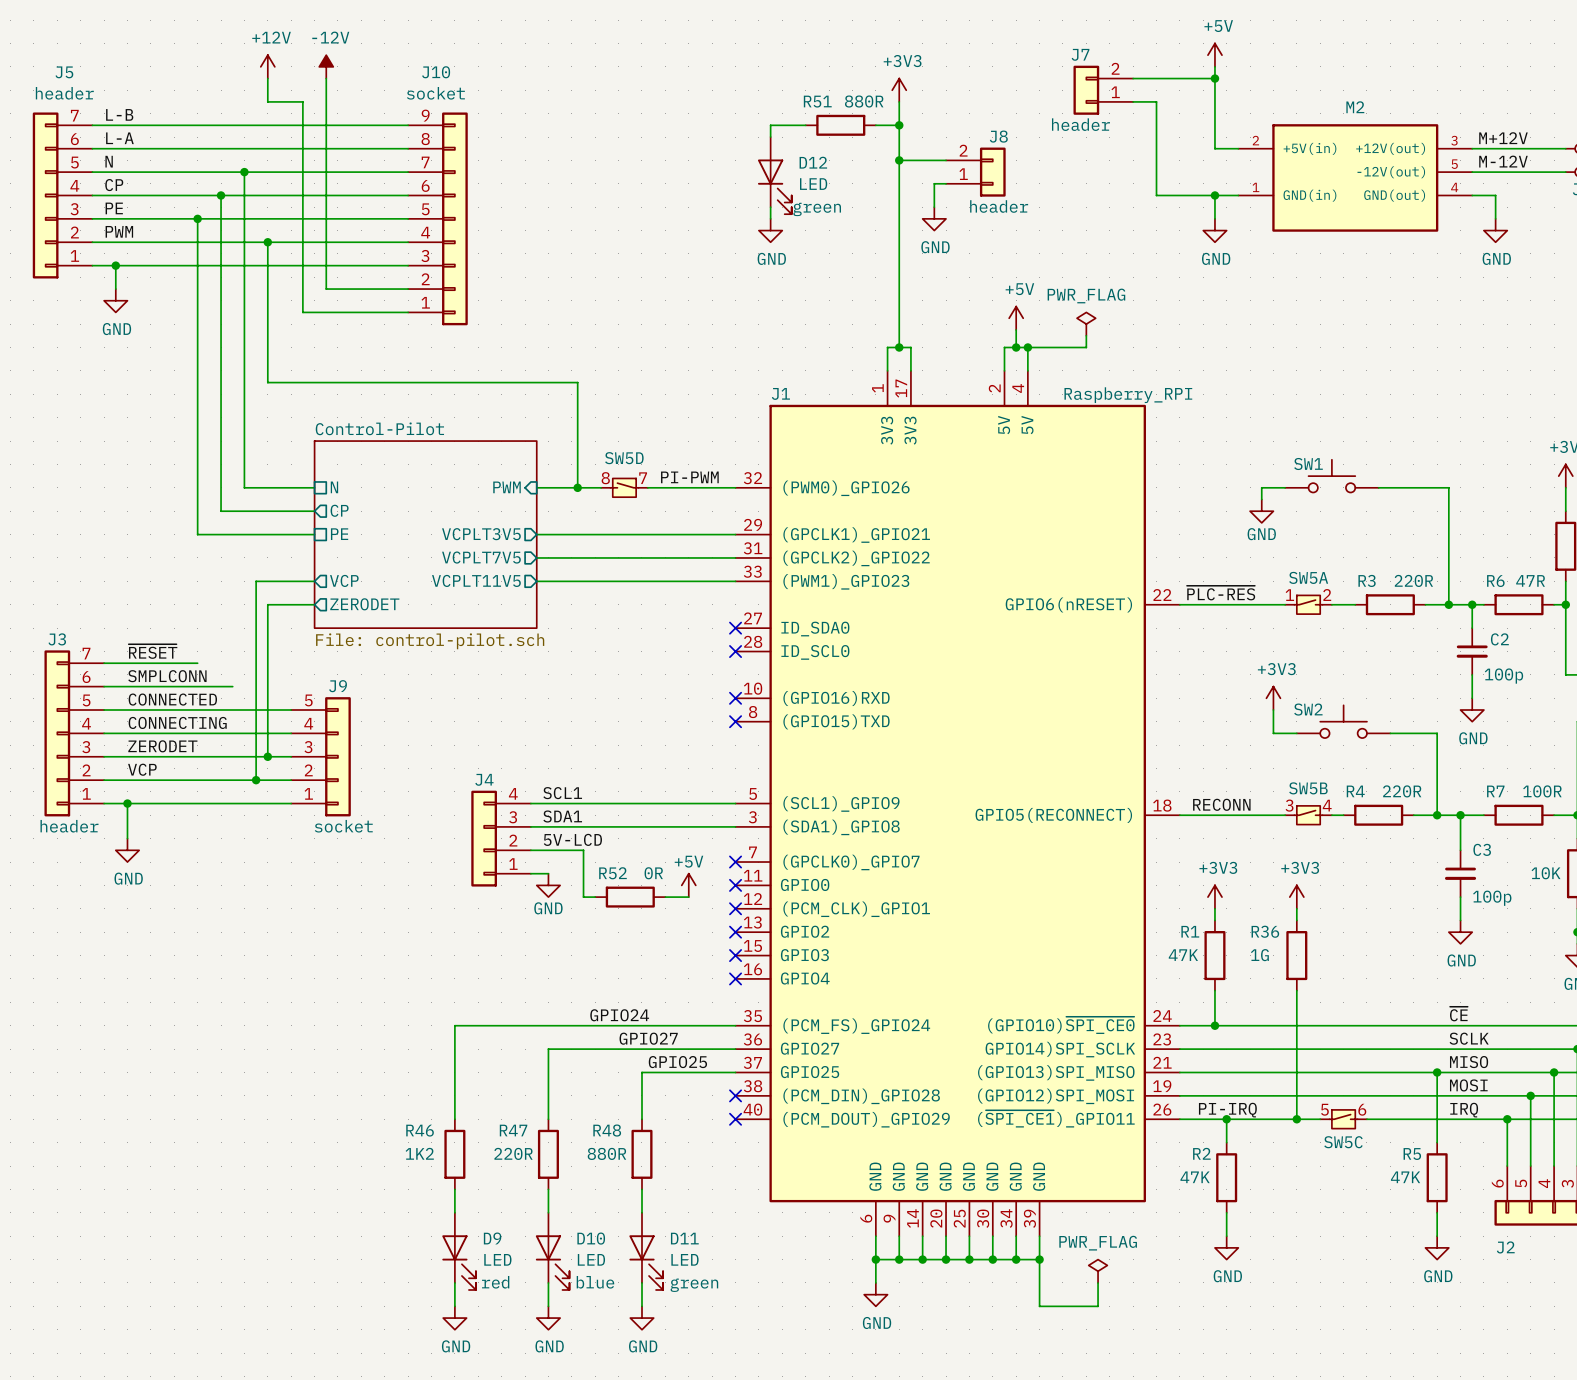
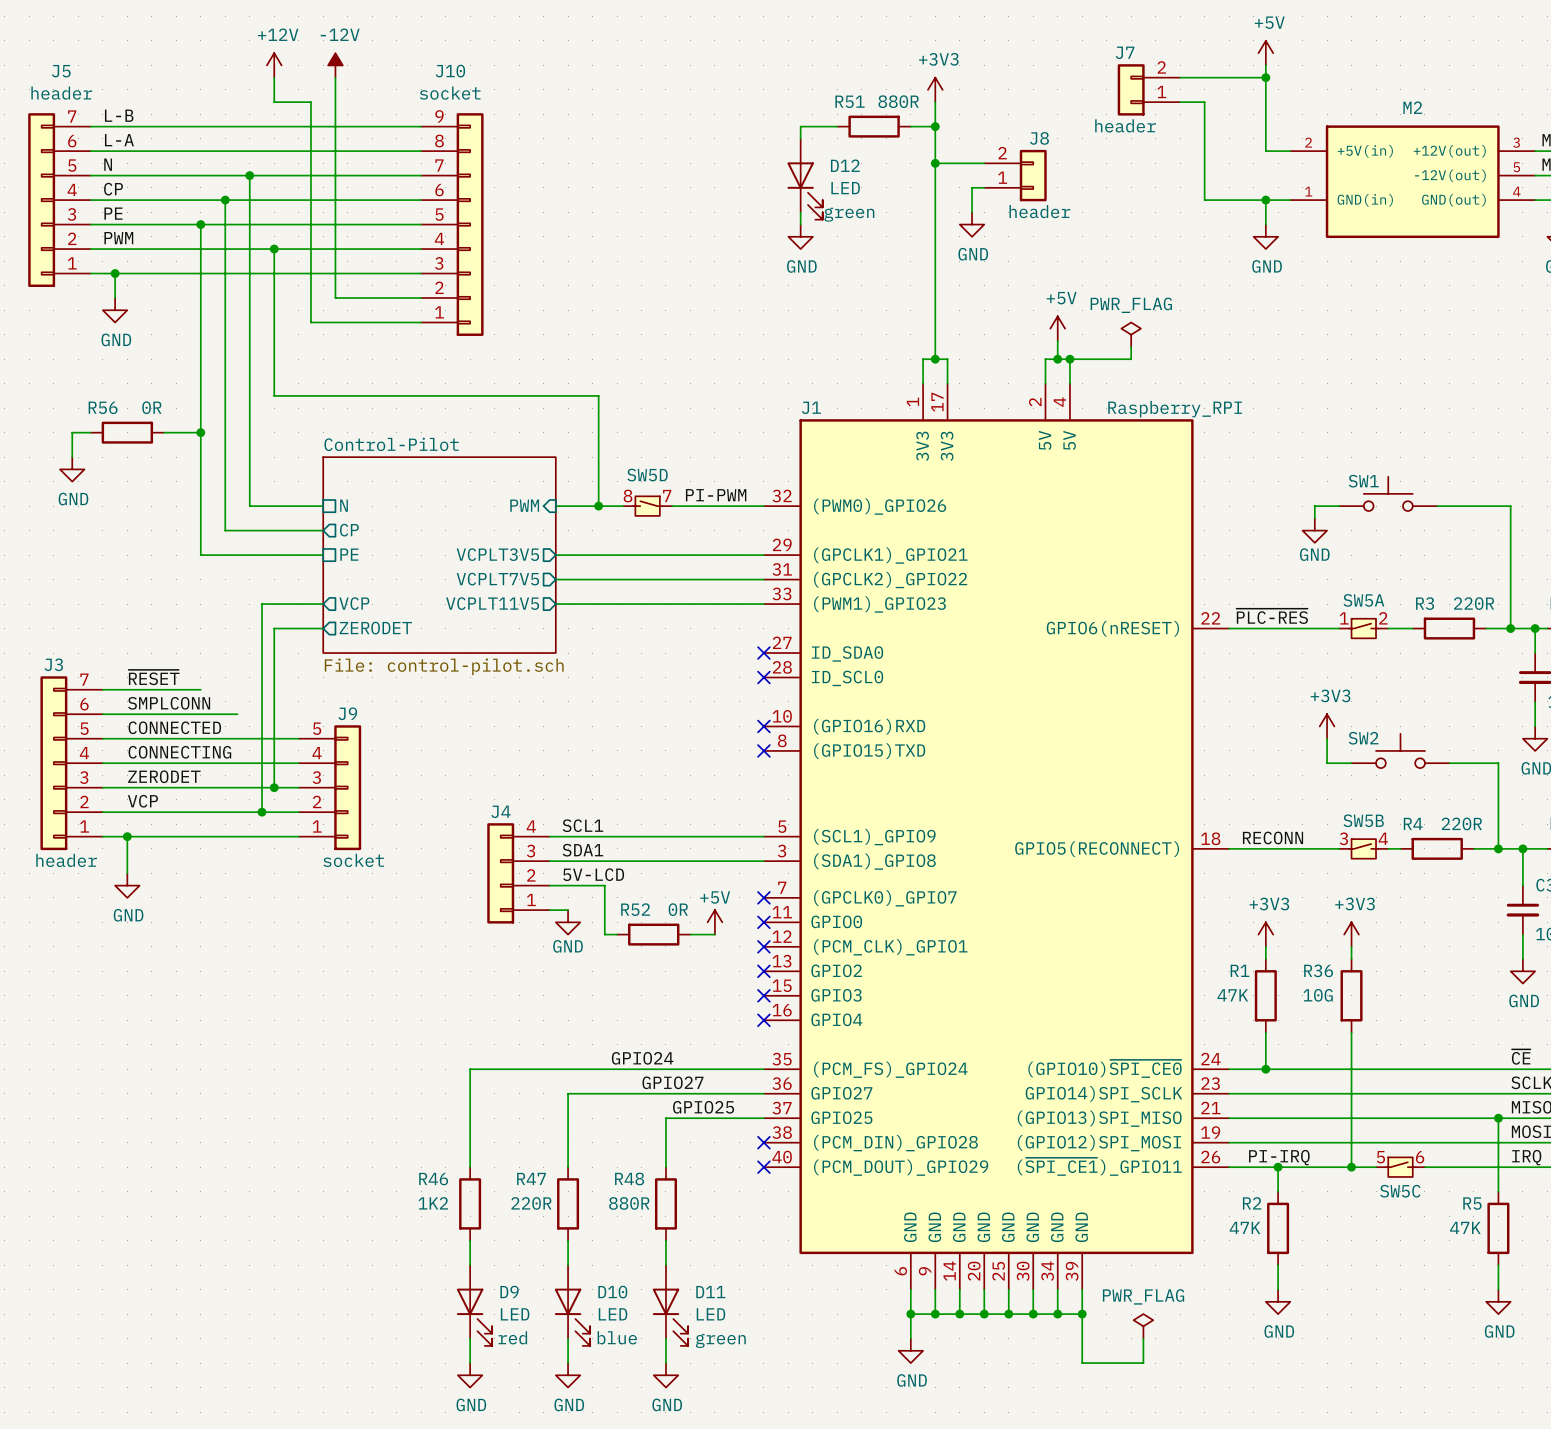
wire: none -> (90, 432) (72, 432) (72, 457)
R56: none -> 0R (127, 432)
wire: none -> (164, 432) (200, 432)
junction: none -> (200, 432)
power symbol: none -> GND (72, 469)
R36 value: 1G (1259, 955) -> 10G (1318, 995)

